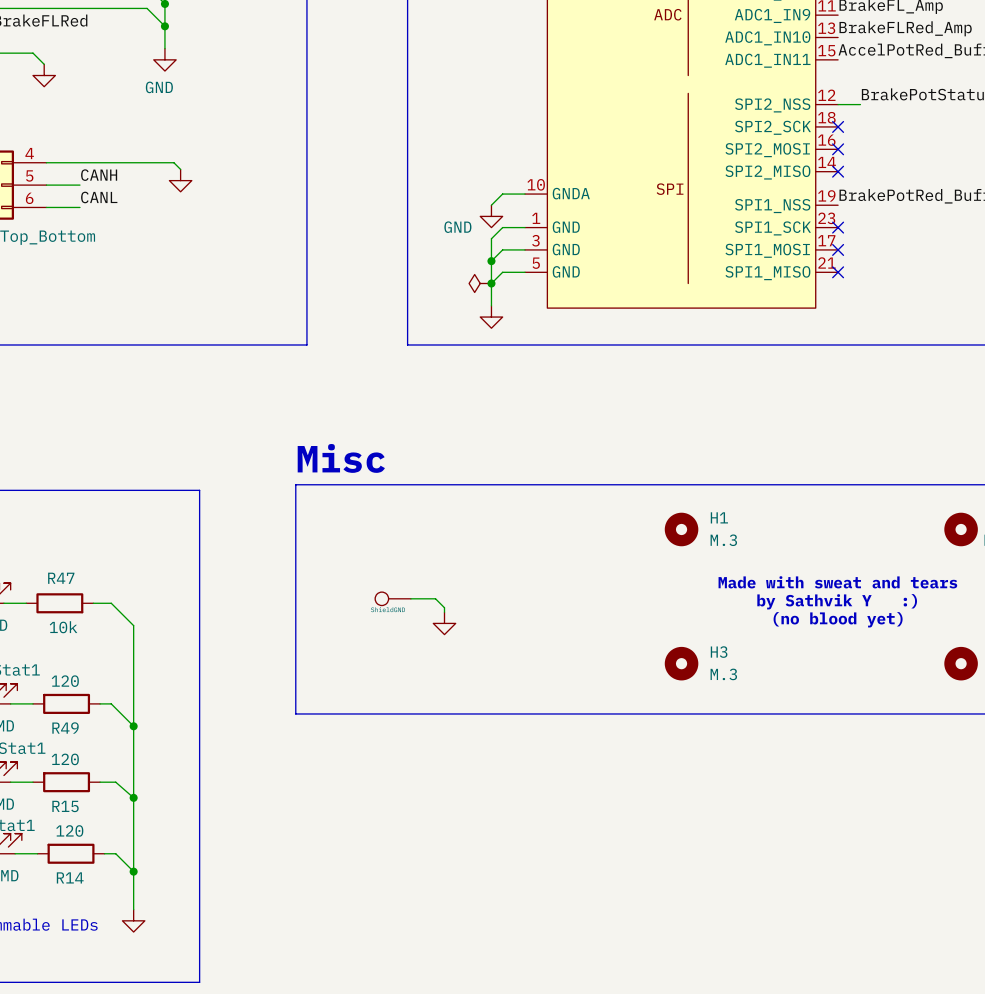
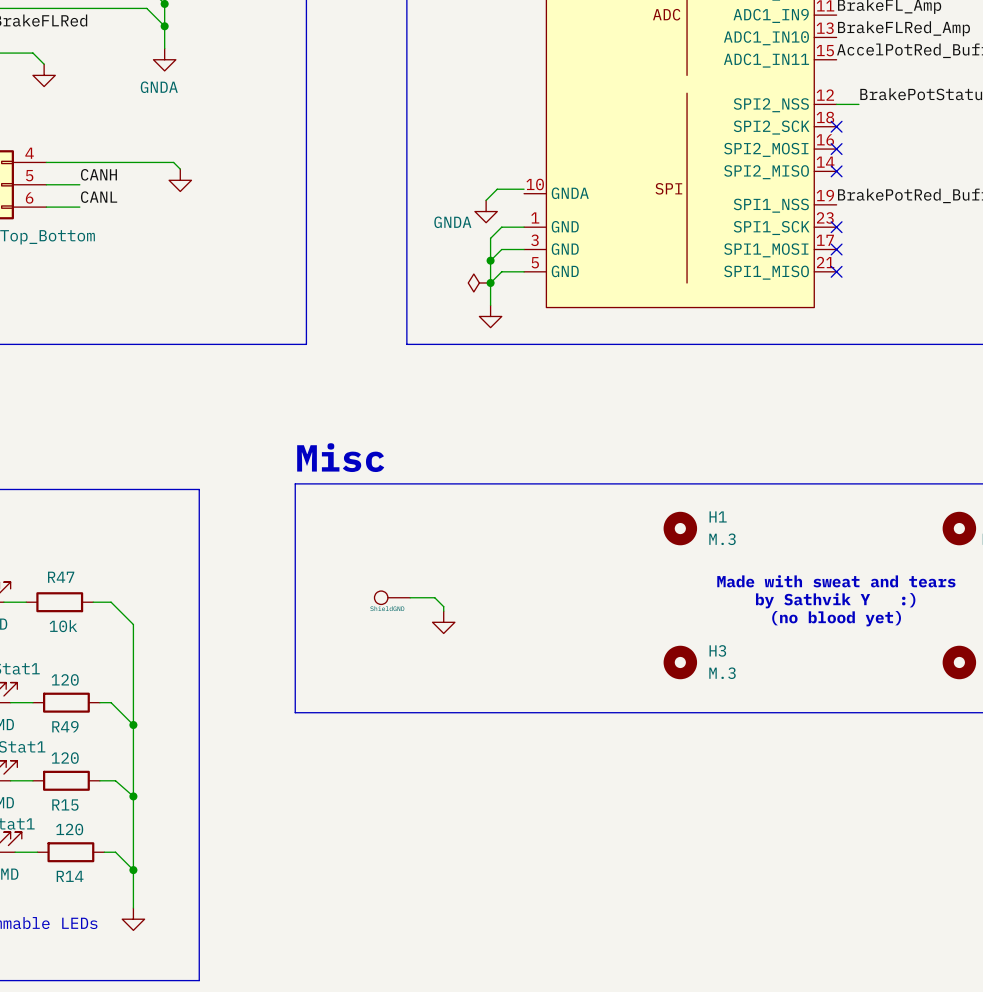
power symbol: GND (164, 59) -> GNDA (164, 59)
wire: none -> (524, 189) (497, 189) (486, 200)
wire: (525, 194) (502, 194) (491, 205) -> none
power symbol: GND (491, 216) -> GNDA (486, 211)

